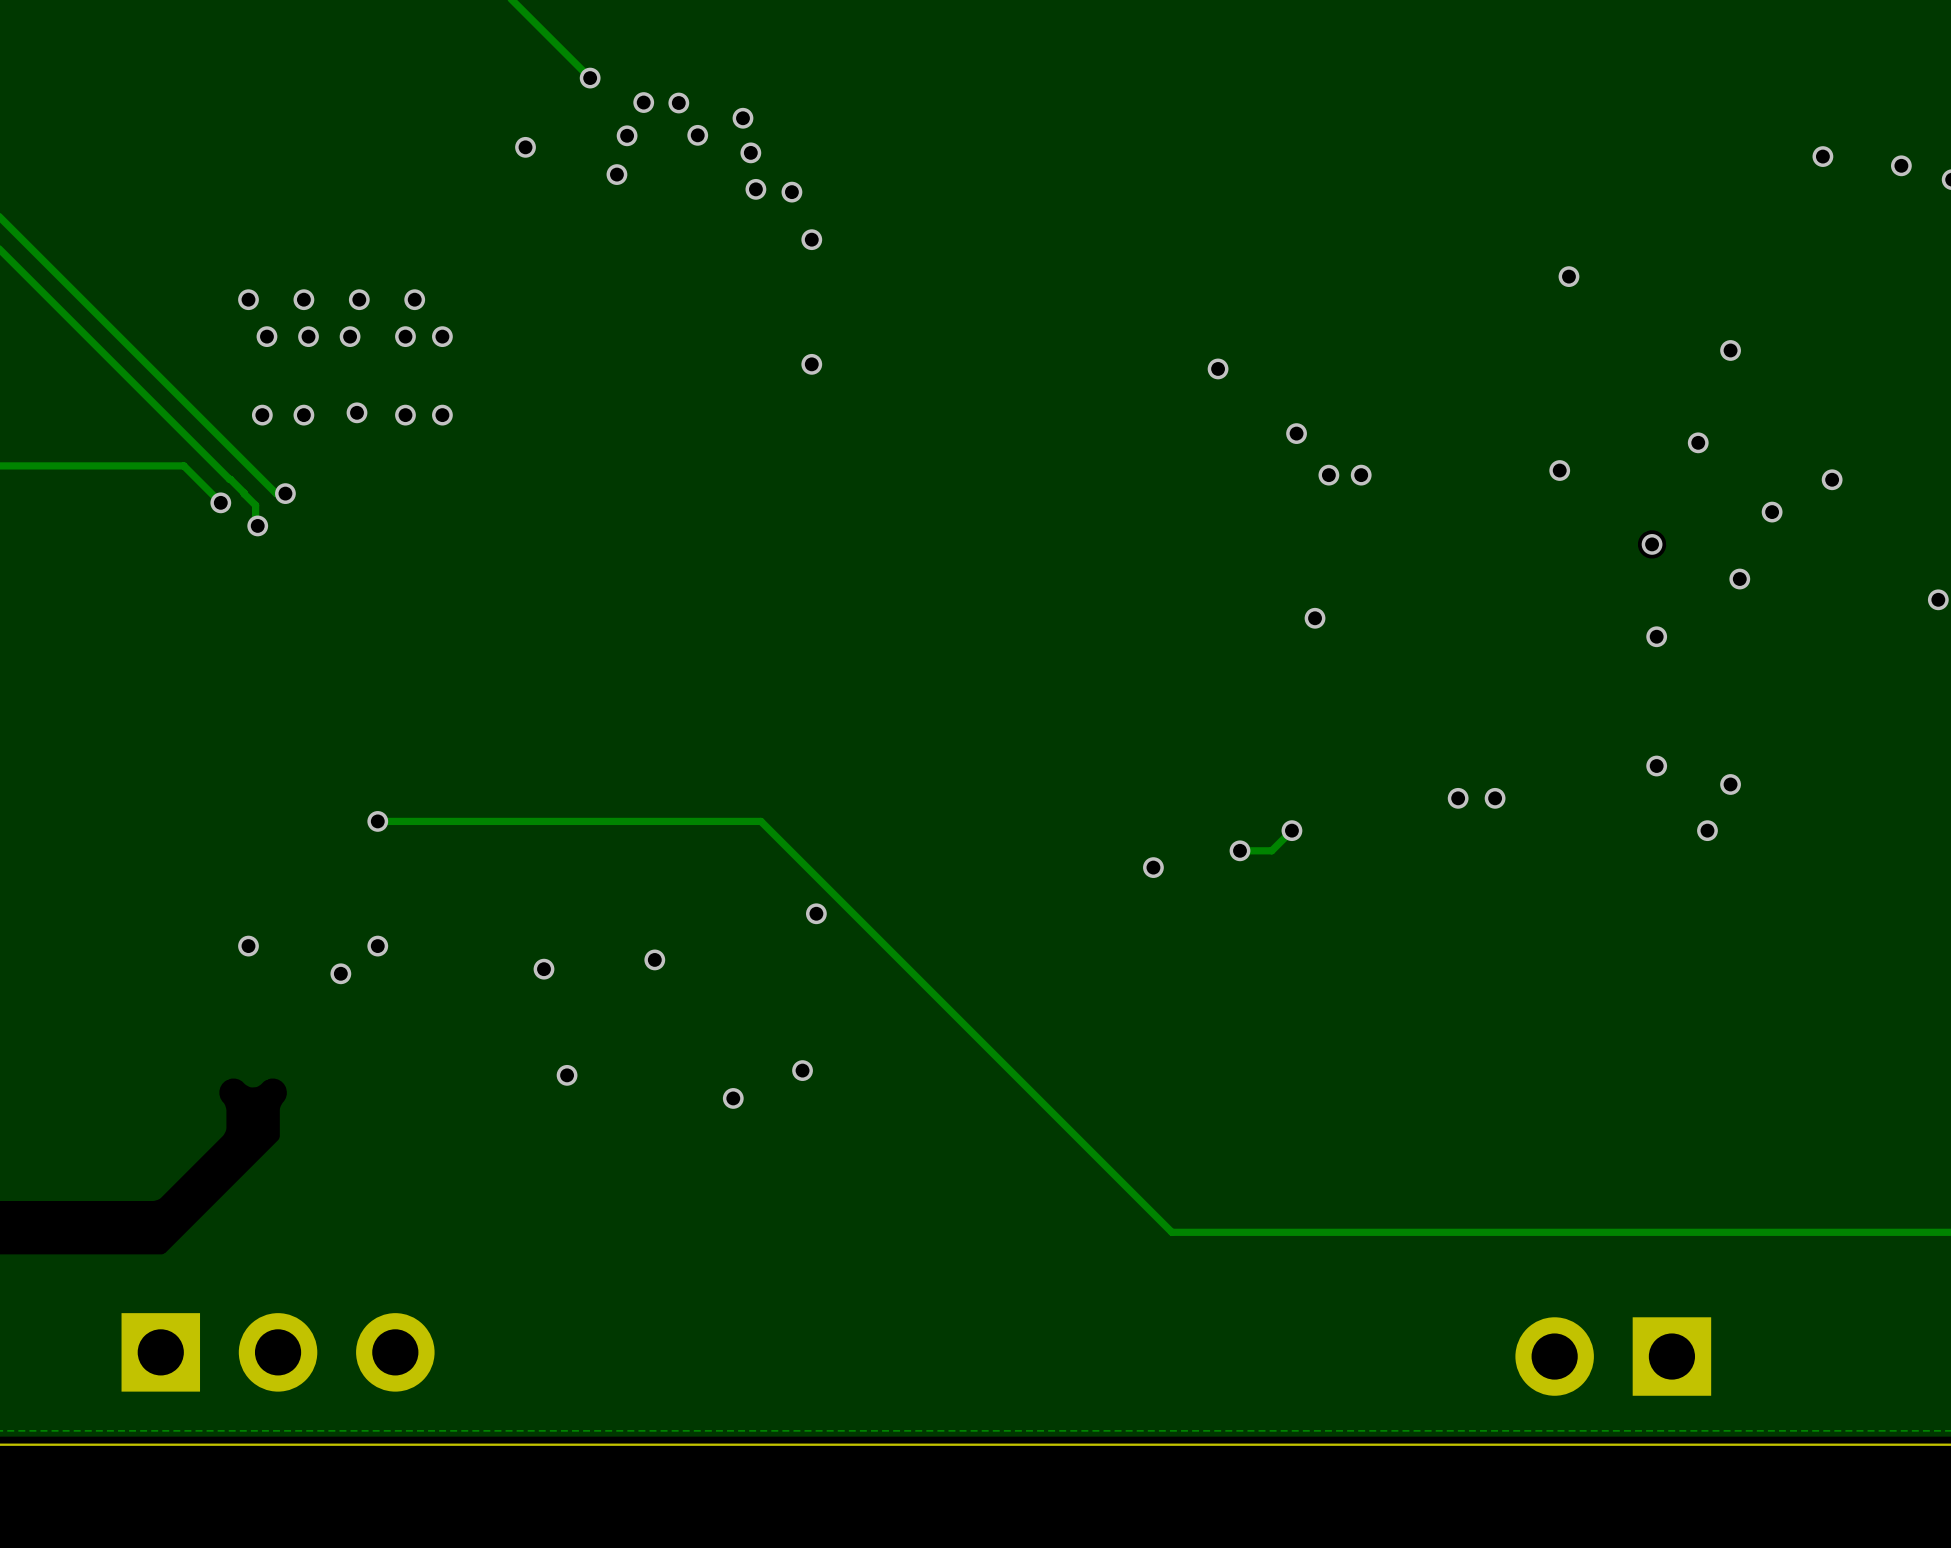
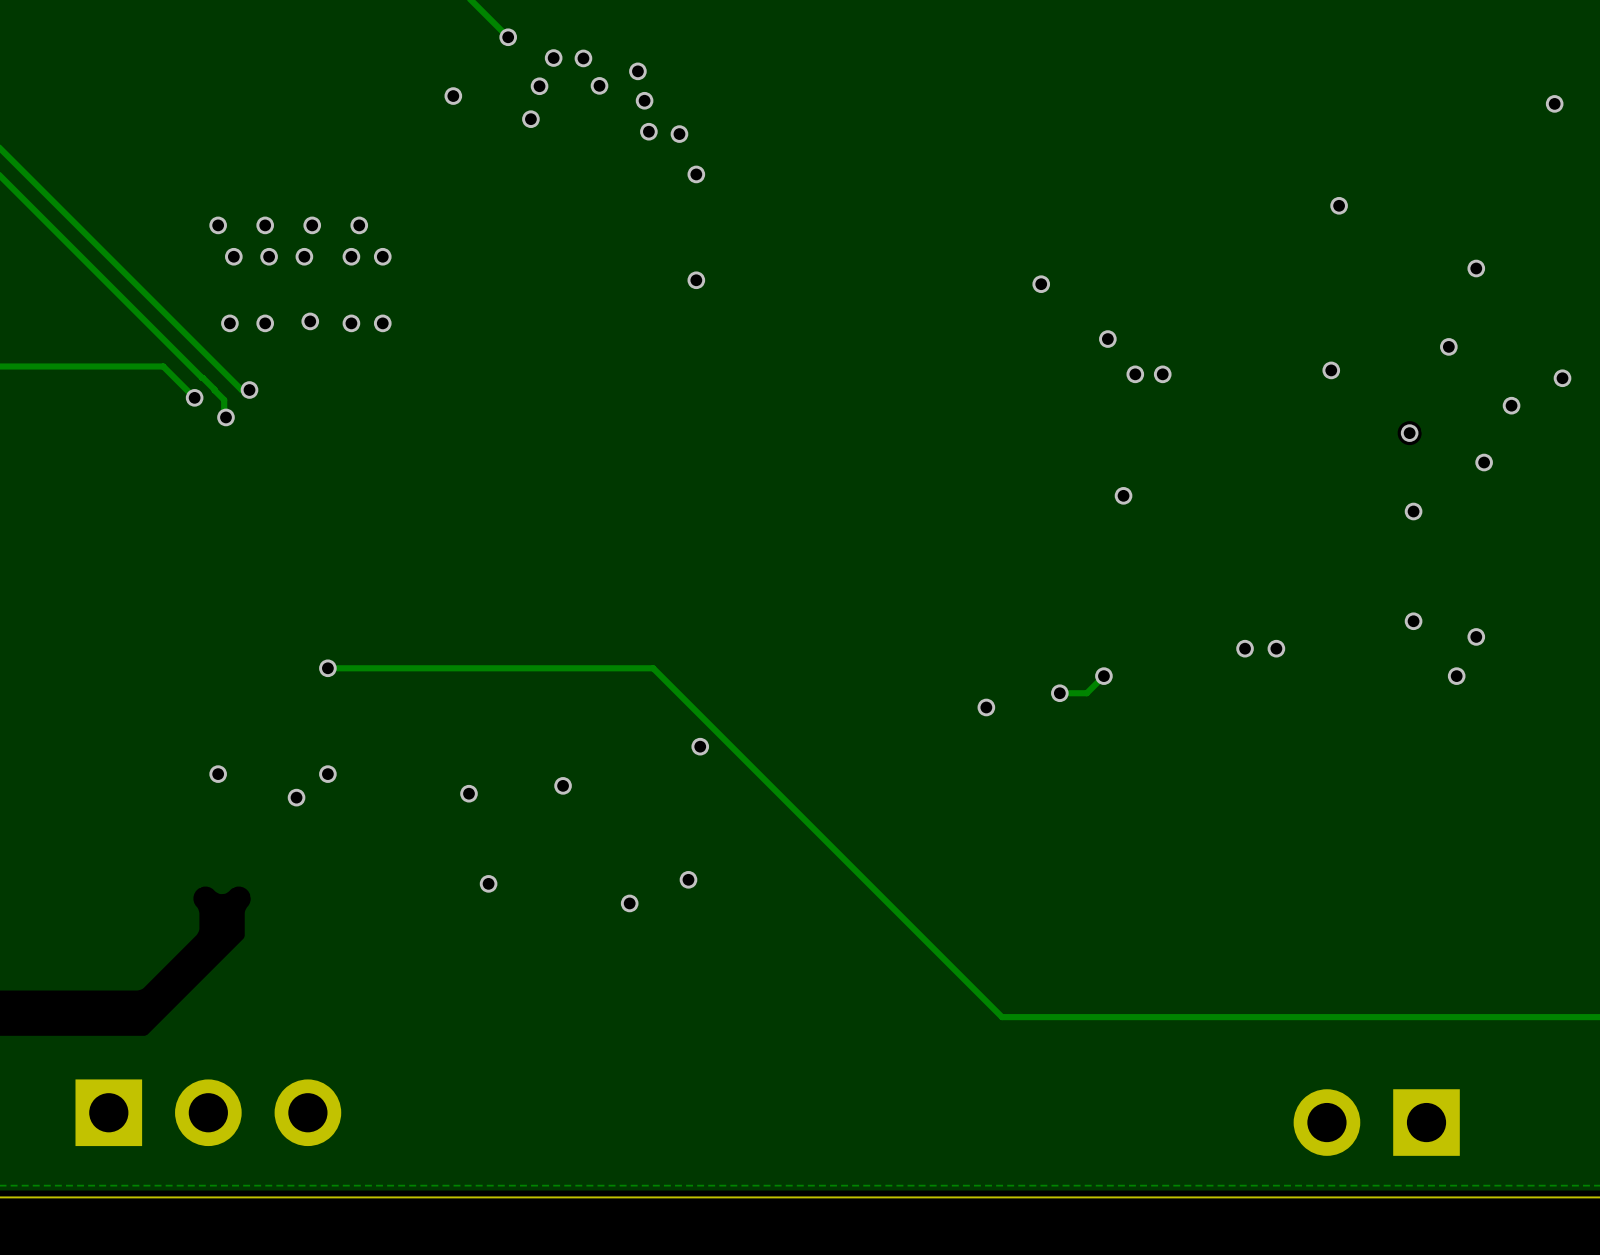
part position: (278, 1352) -> (208, 1112)

